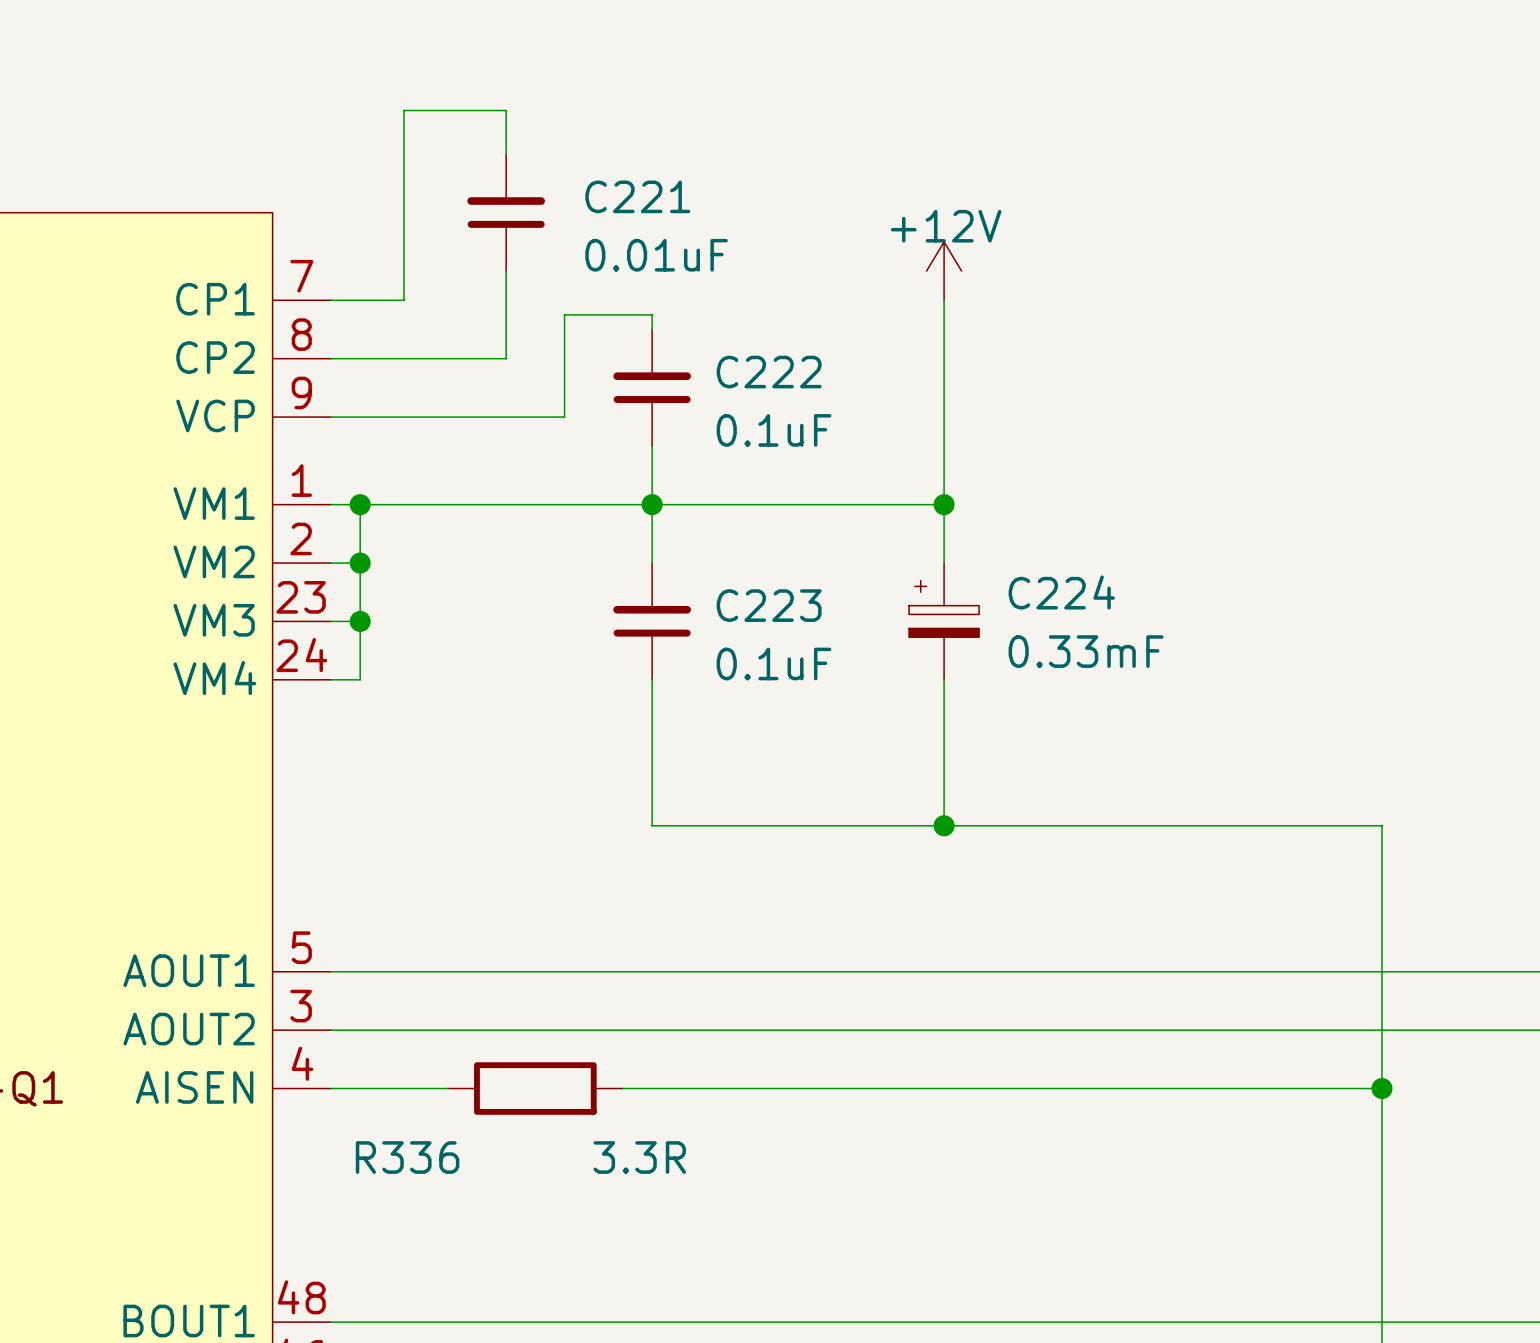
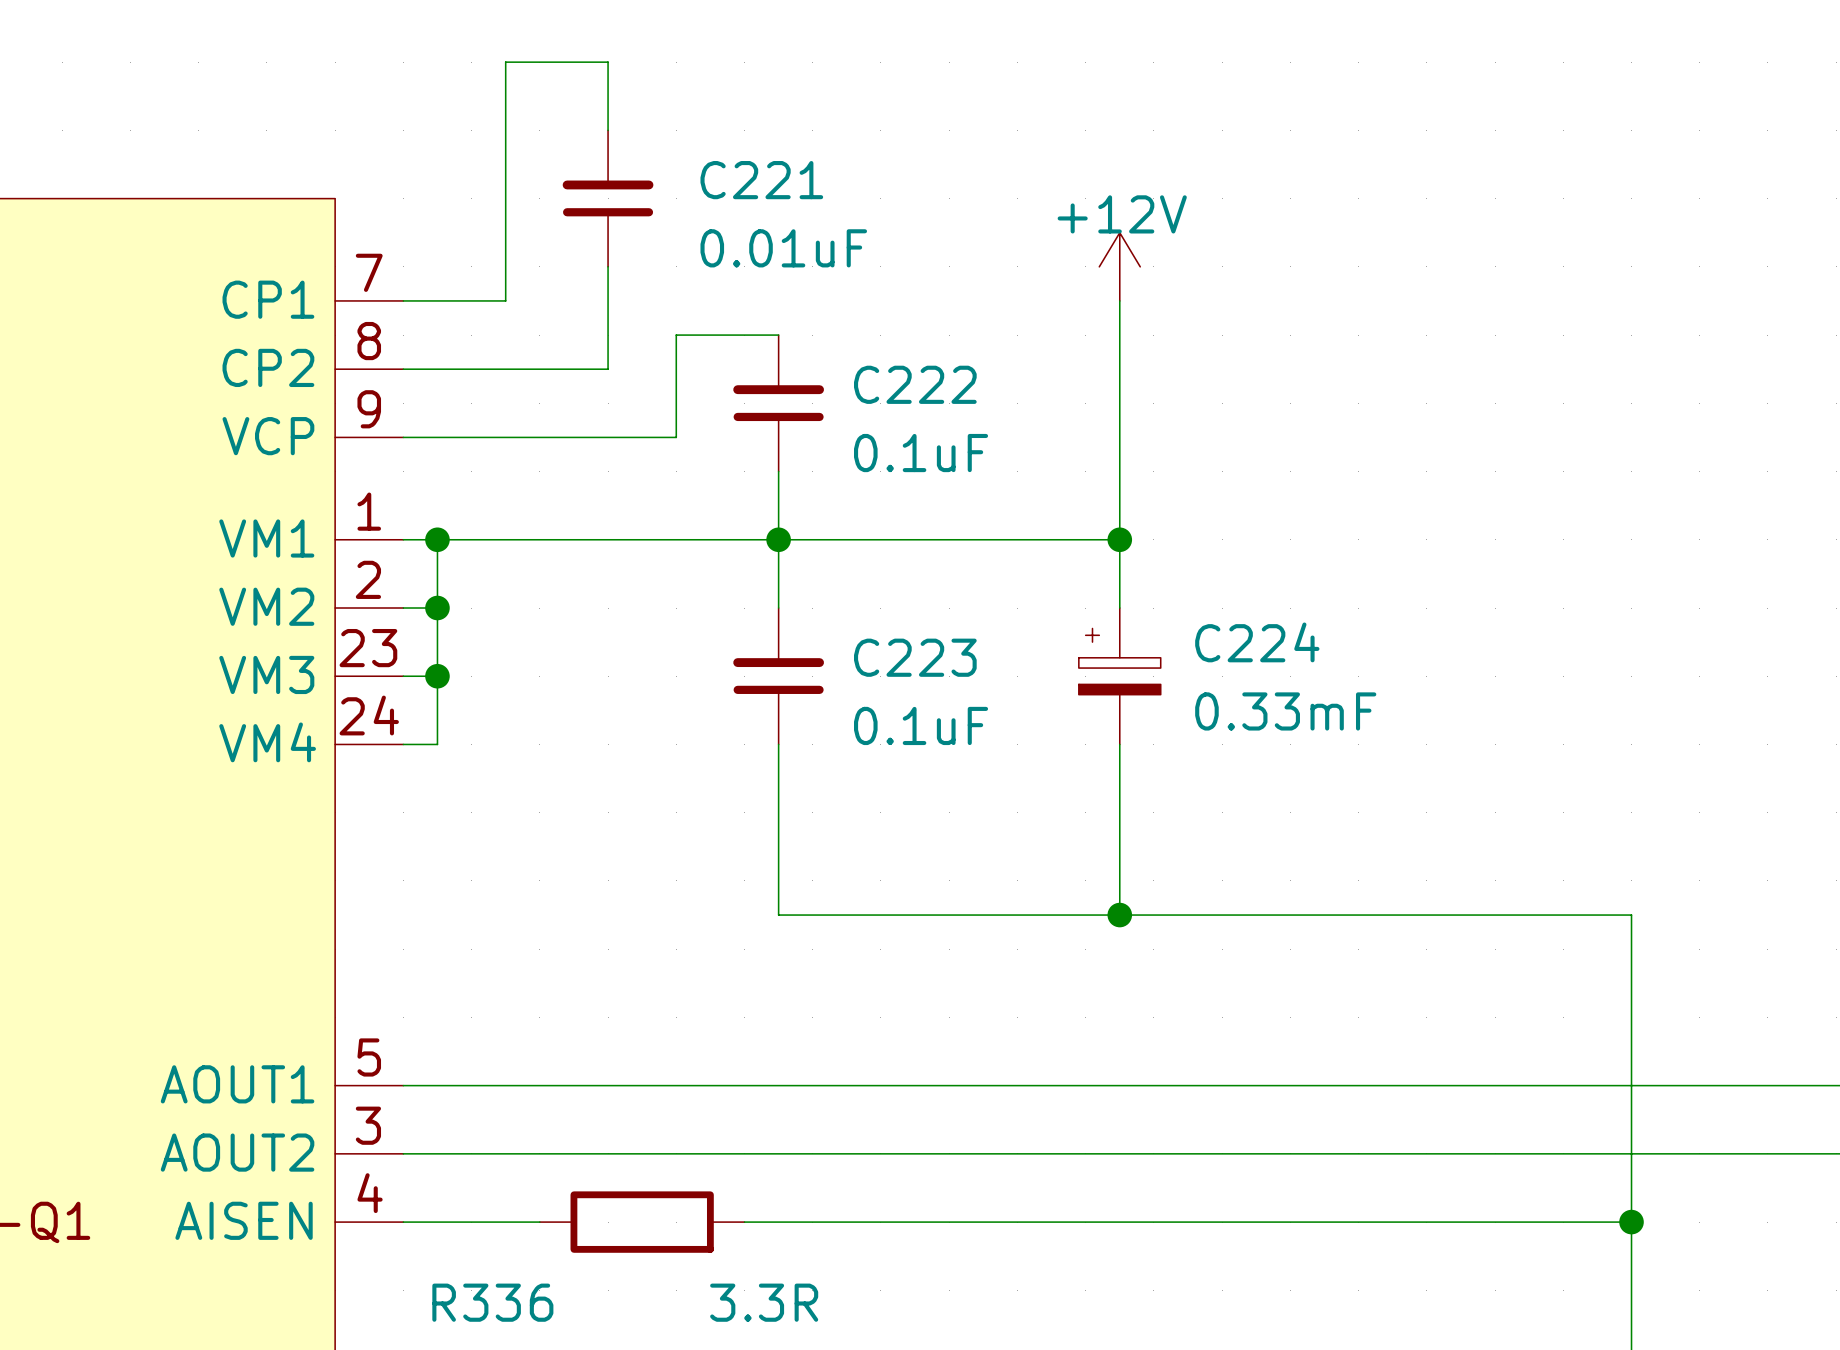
wire: (506, 110) (403, 110) (403, 300) -> (608, 79) (608, 62) (505, 62) (505, 300) (488, 300)
wire: (564, 329) (564, 314) (652, 314) (652, 329) -> (676, 335) (778, 335)

